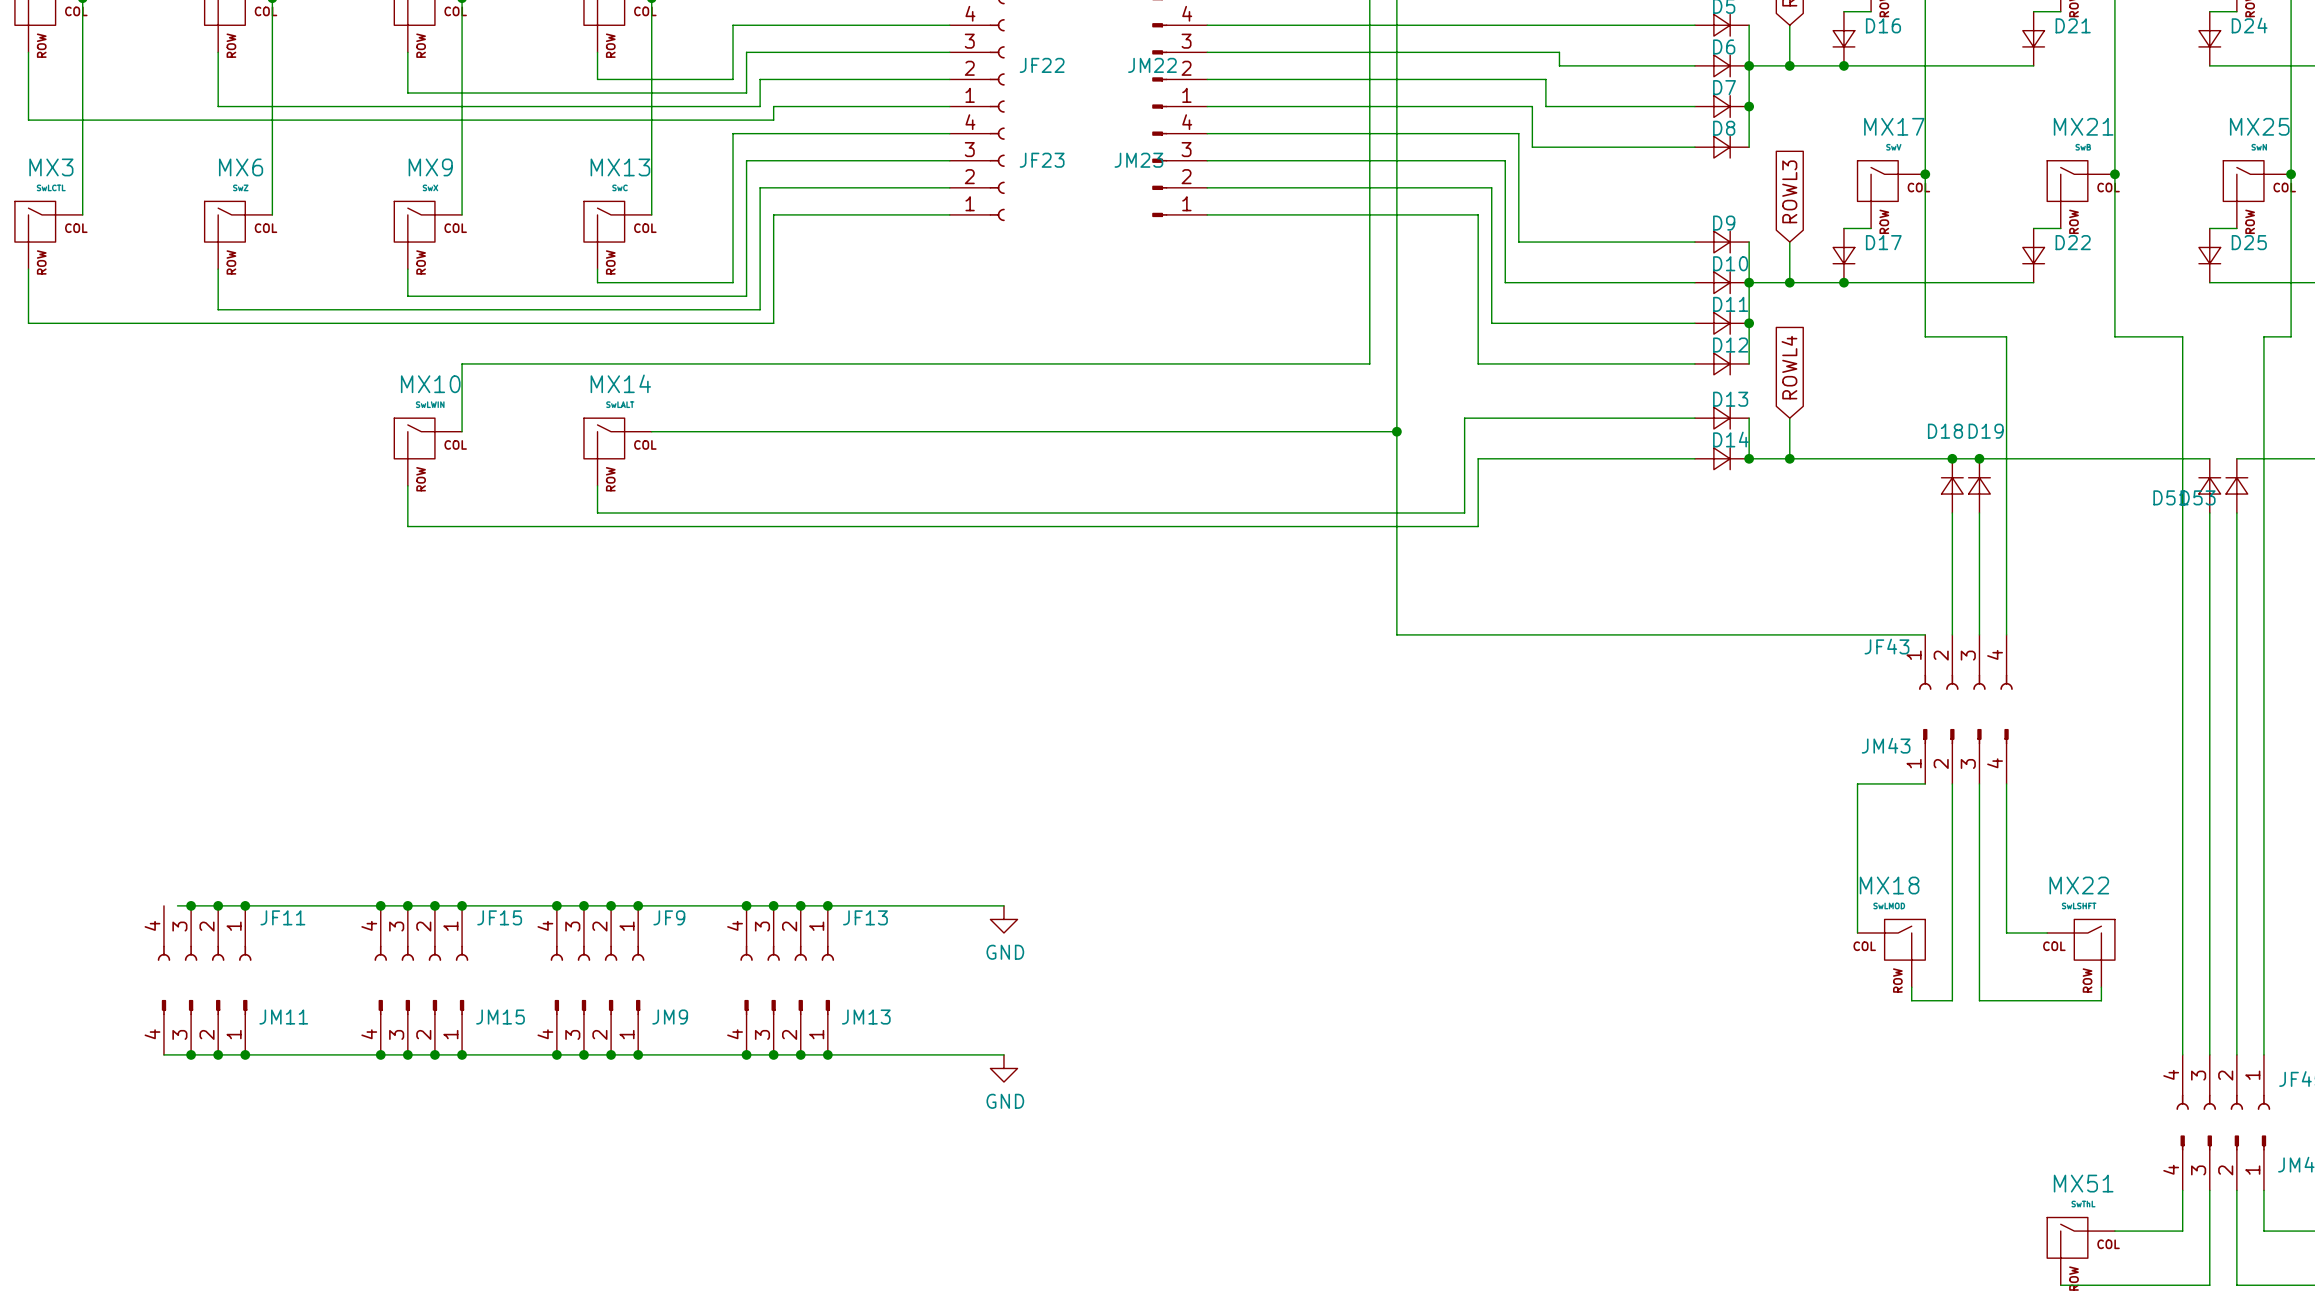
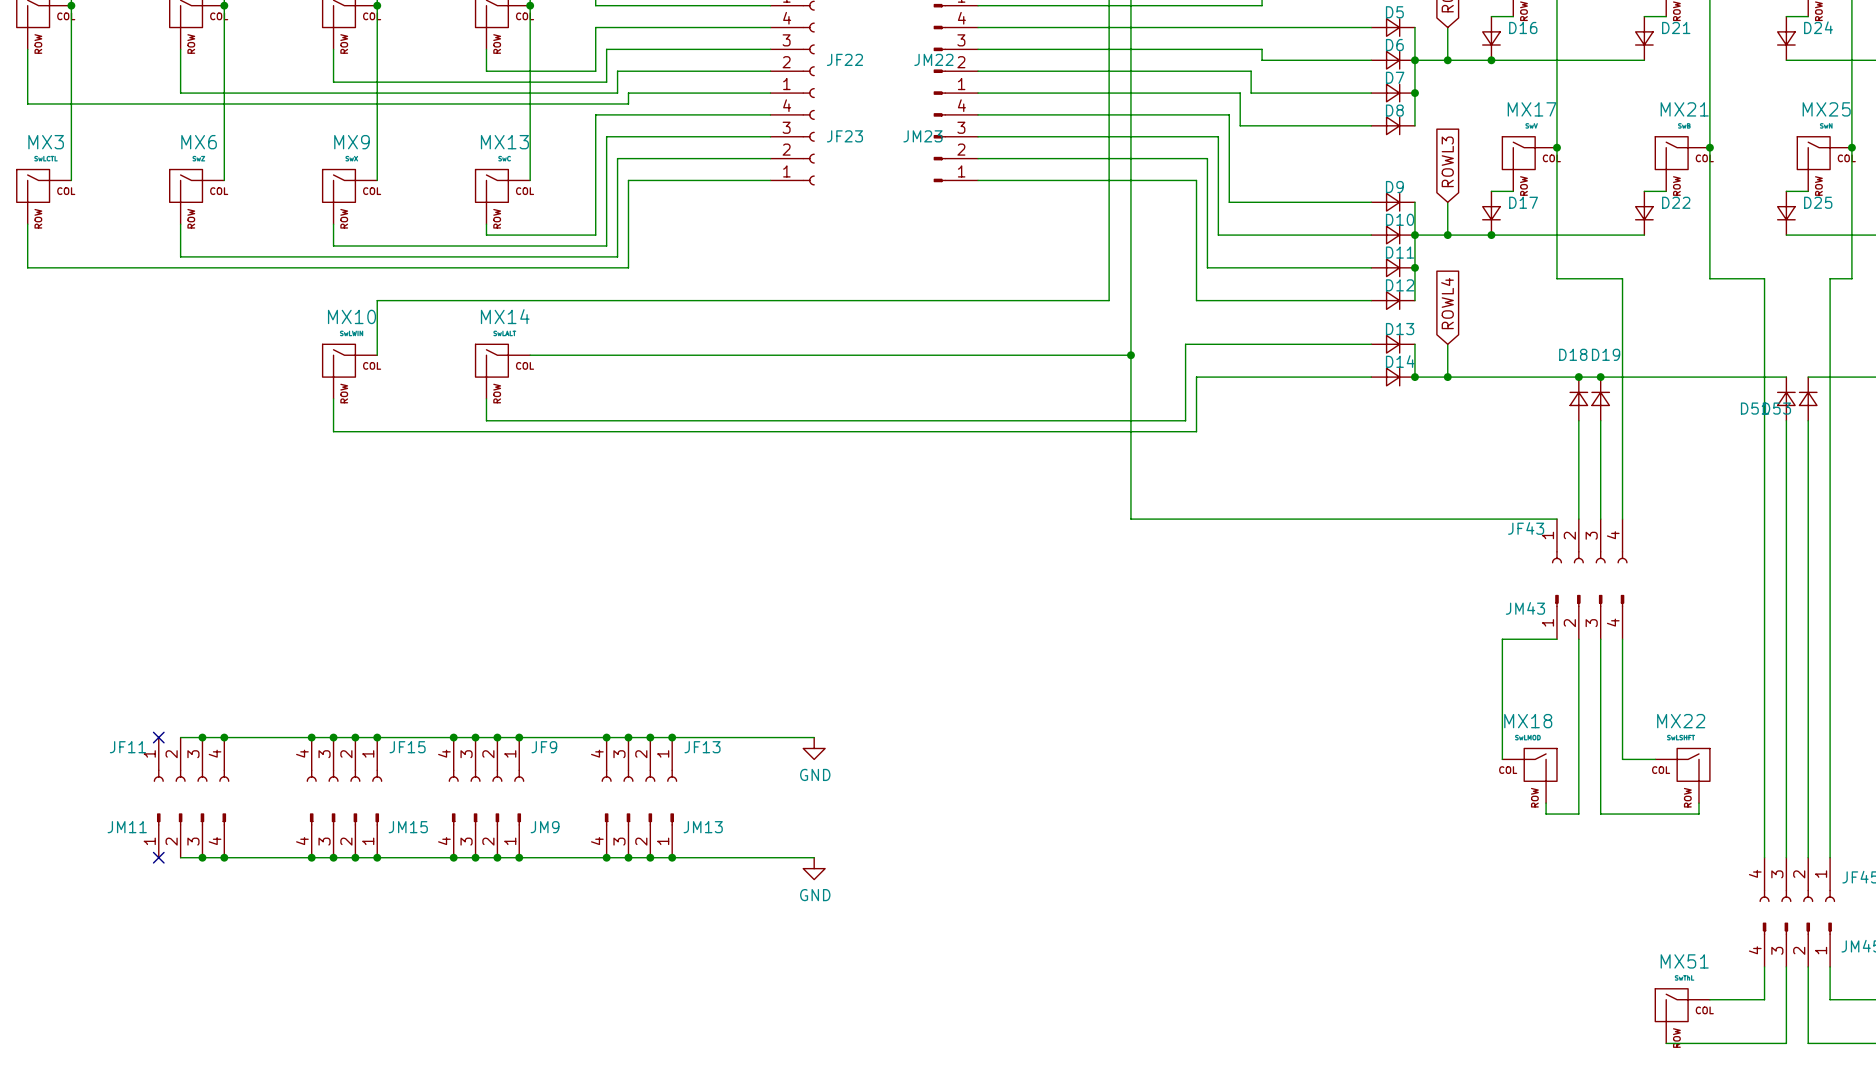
wire: (177, 905) (218, 905) -> none
junction: (191, 905) -> none
no-connect mark: none -> (158, 737)
junction: (218, 905) -> none
junction: none -> (224, 737)
JF11 flip: as is (204, 953) -> left-right (191, 775)
JM11 flip: as is (204, 1007) -> left-right (191, 819)
wire: (163, 1054) (218, 1054) -> none
junction: (191, 1054) -> none
no-connect mark: none -> (158, 857)
junction: (218, 1054) -> none
junction: none -> (224, 857)

